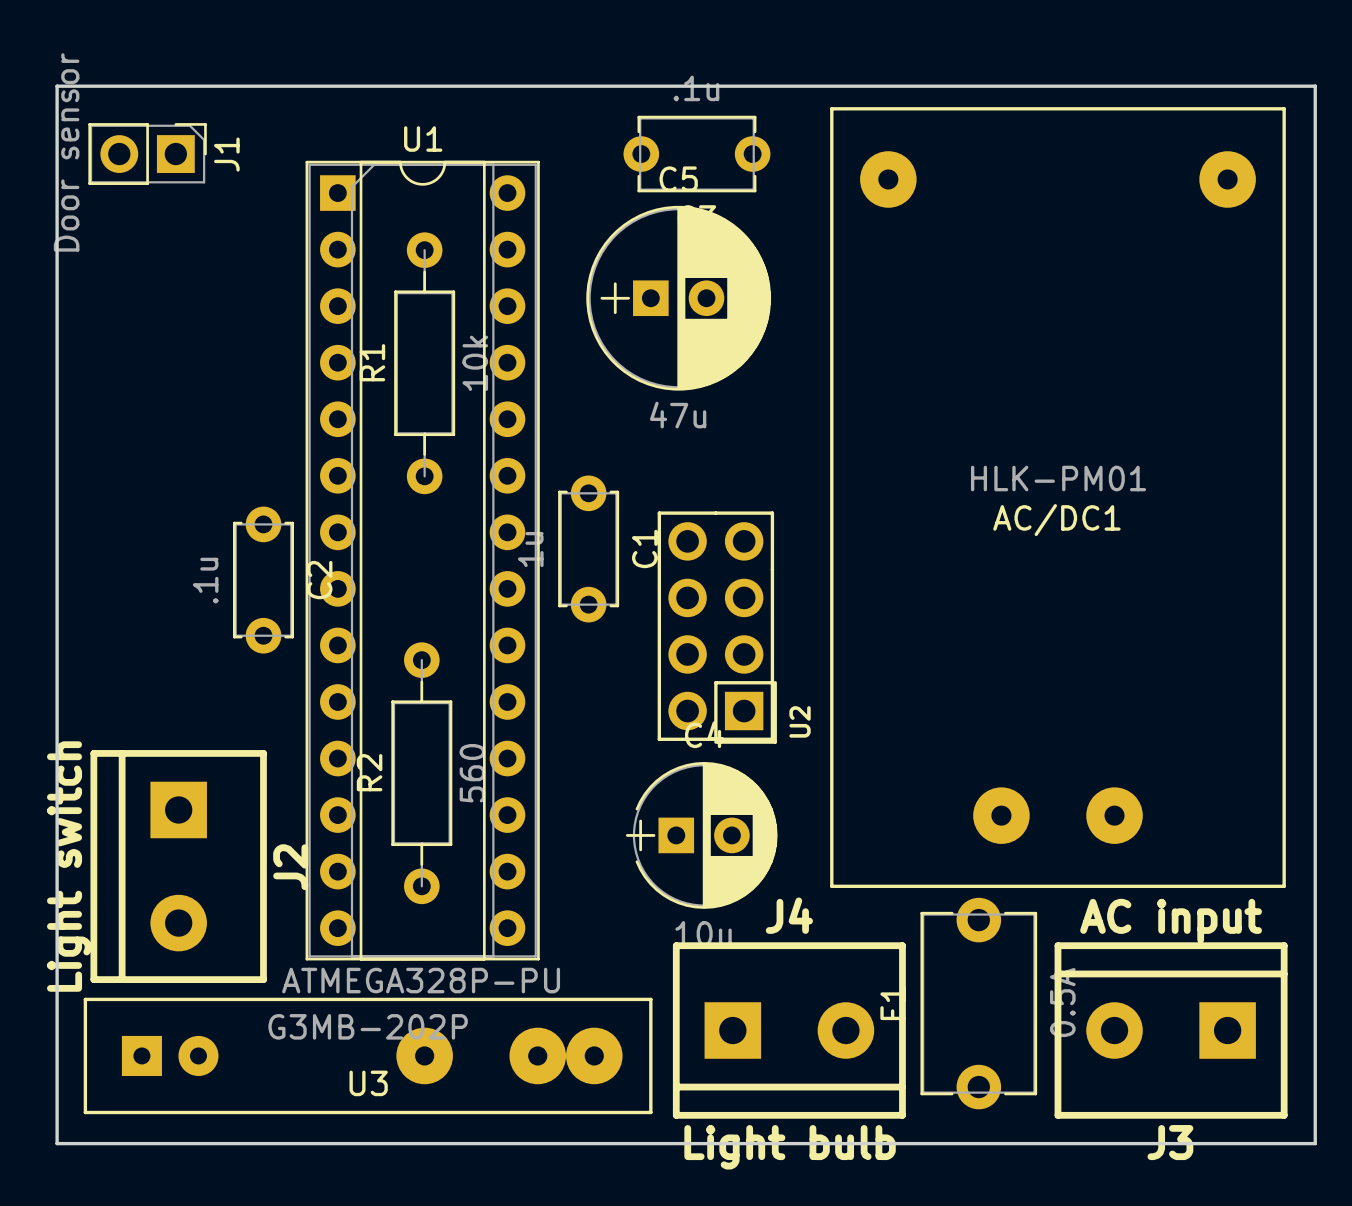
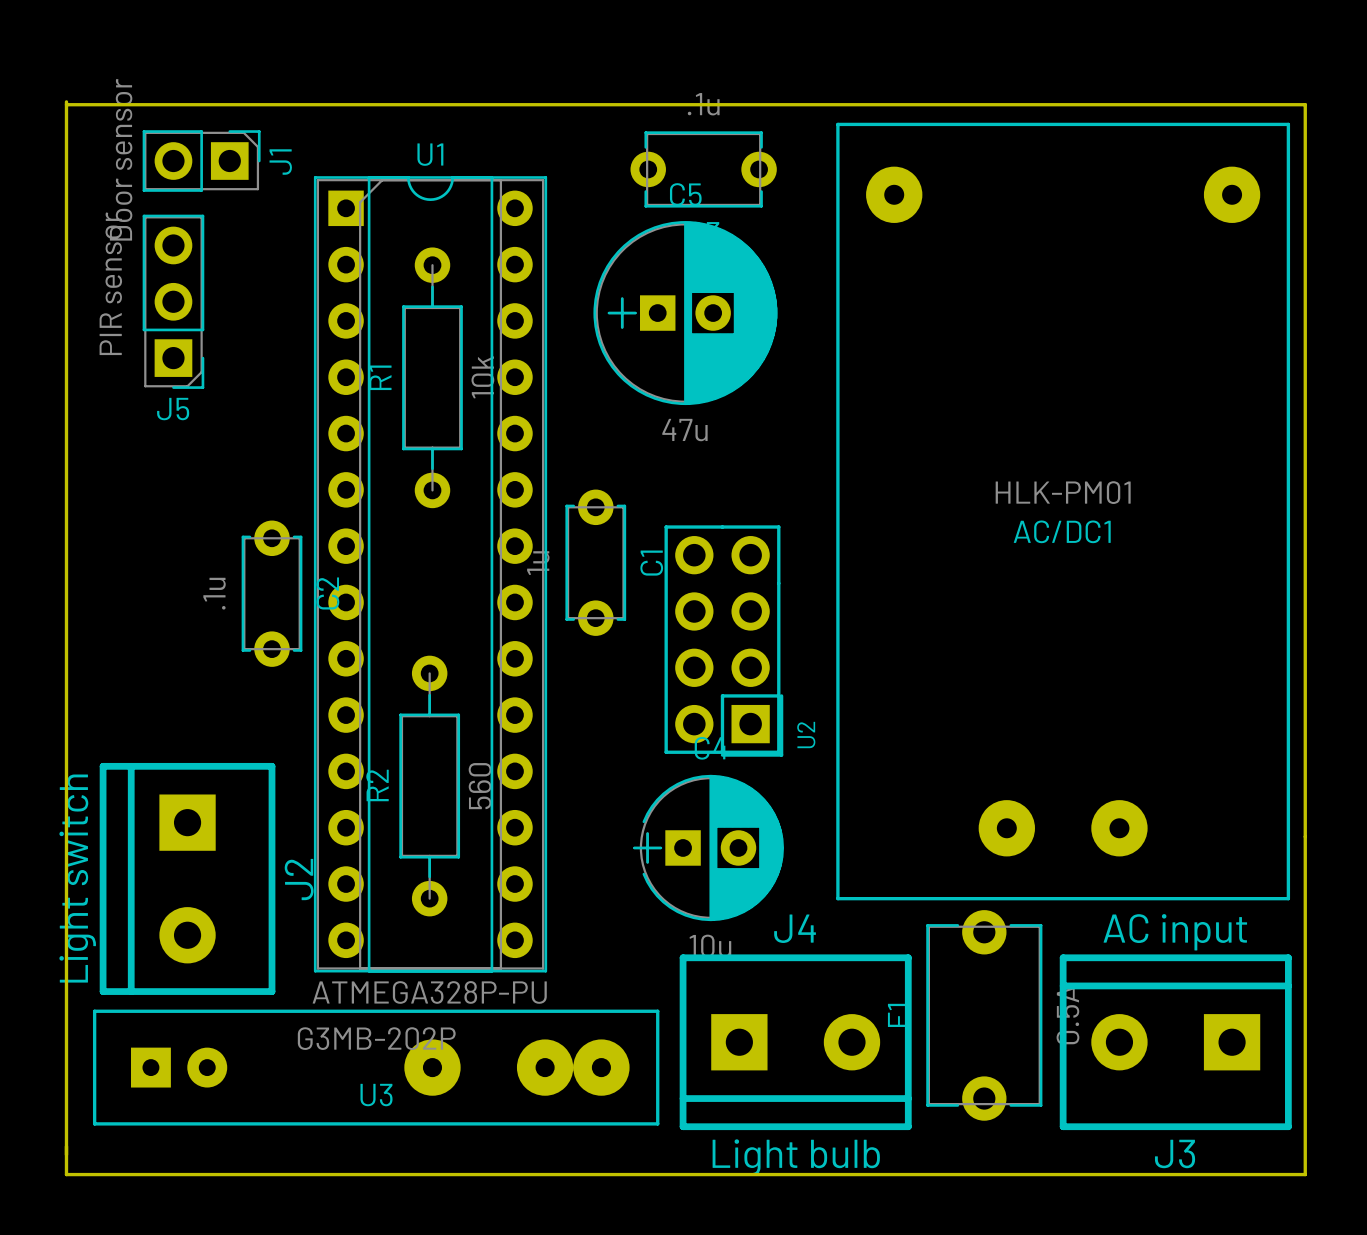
board edge: (57, 86) (1315, 86) (1315, 1143) (57, 1143) -> (66, 104) (1305, 104) (1305, 1174) (66, 1174) (66, 1154)
J1 position: (147, 154) -> (201, 161)
J5: none -> PIR sensor (173, 301)

